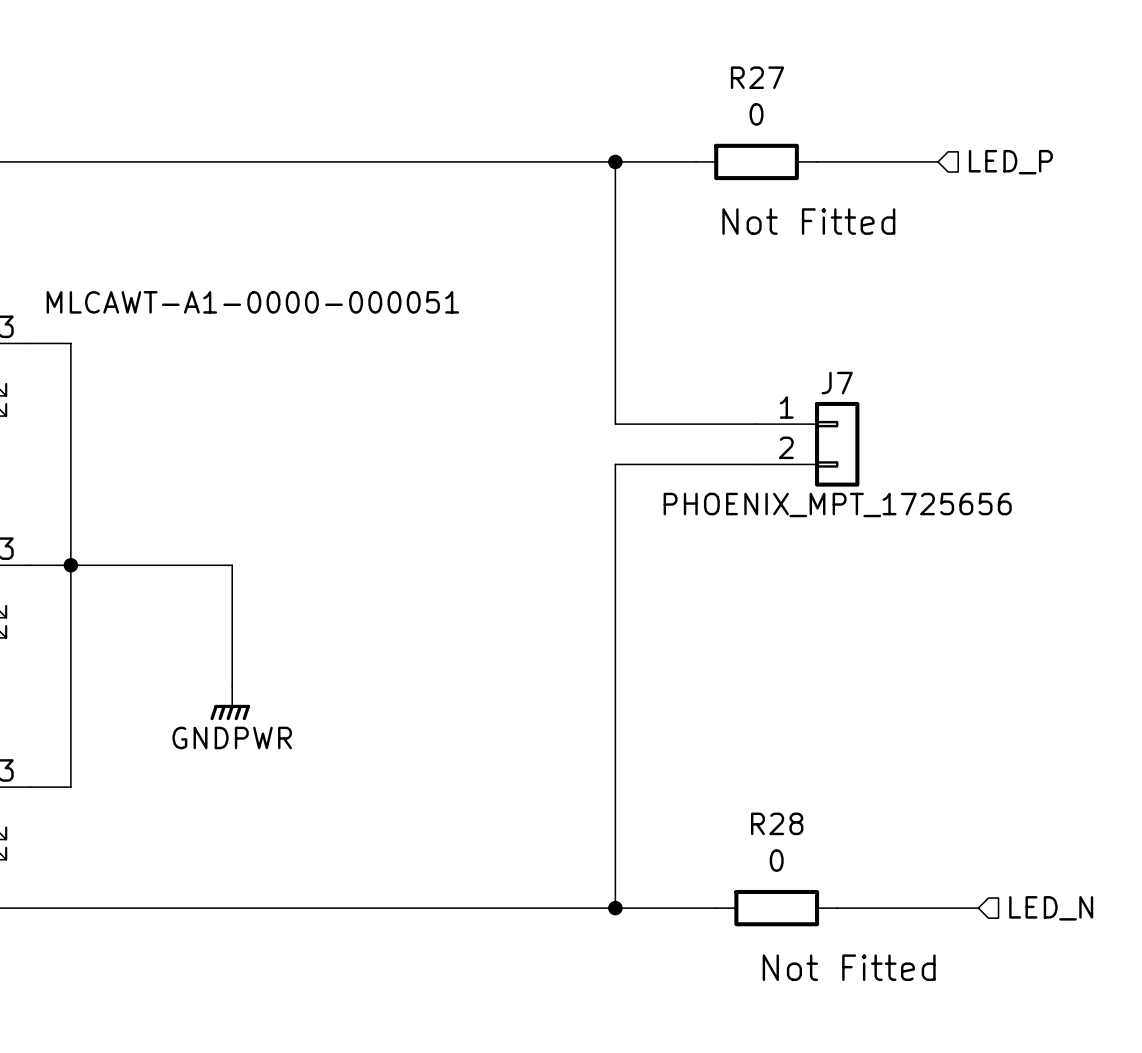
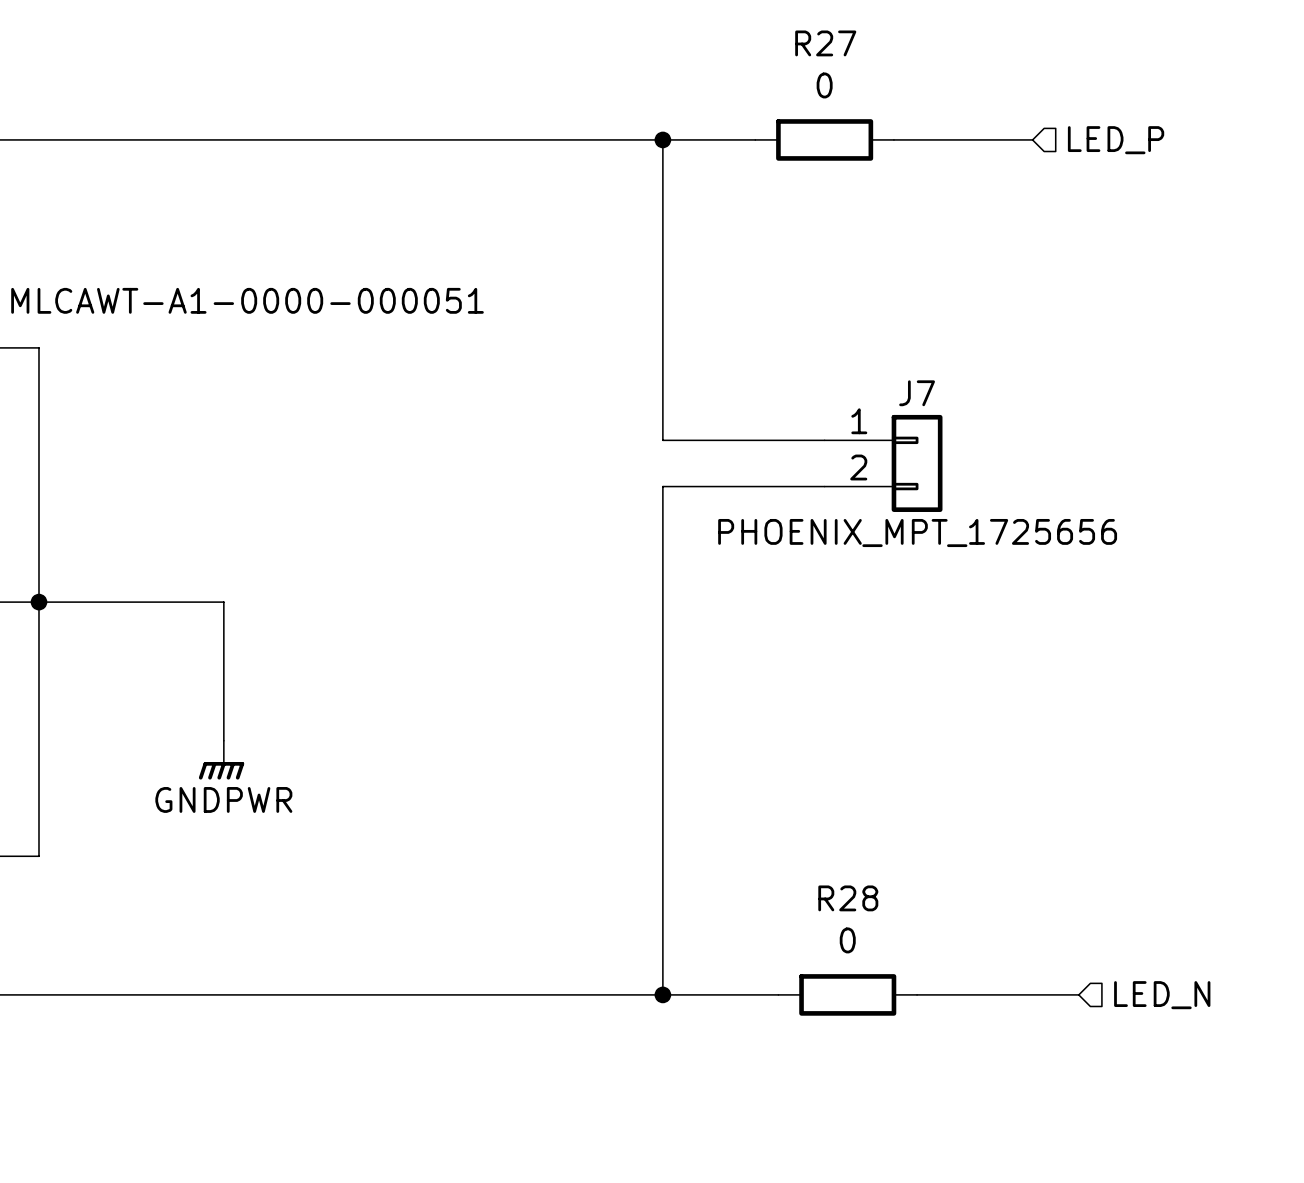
R27 text: Not Fitted (808, 221) -> none
R28 text: Not Fitted (849, 967) -> none

